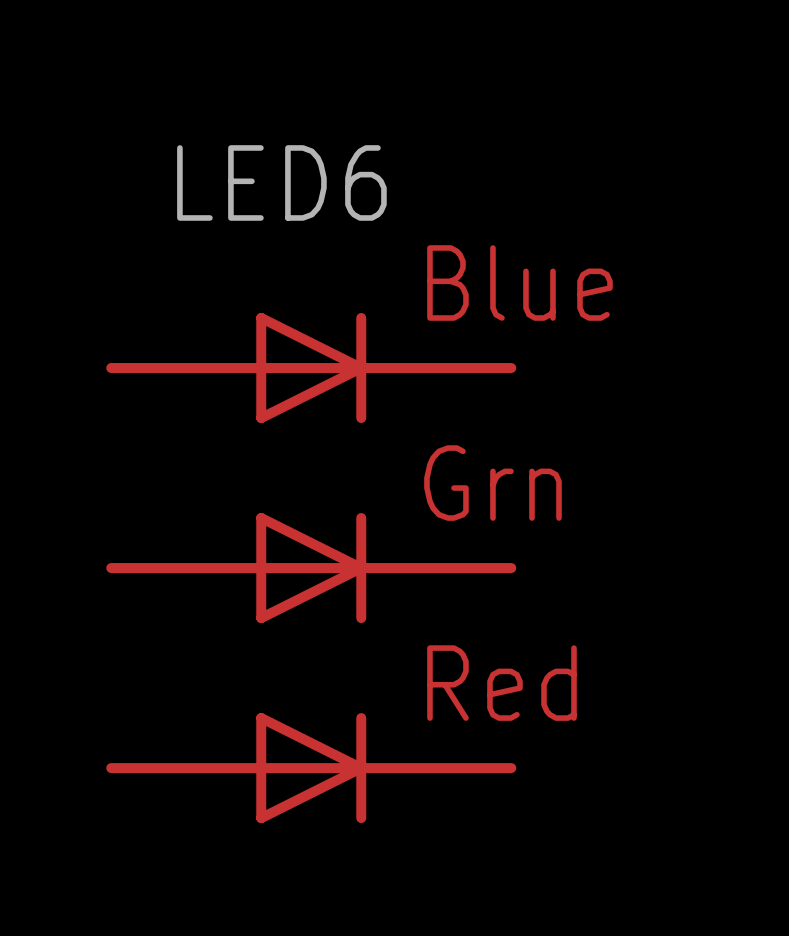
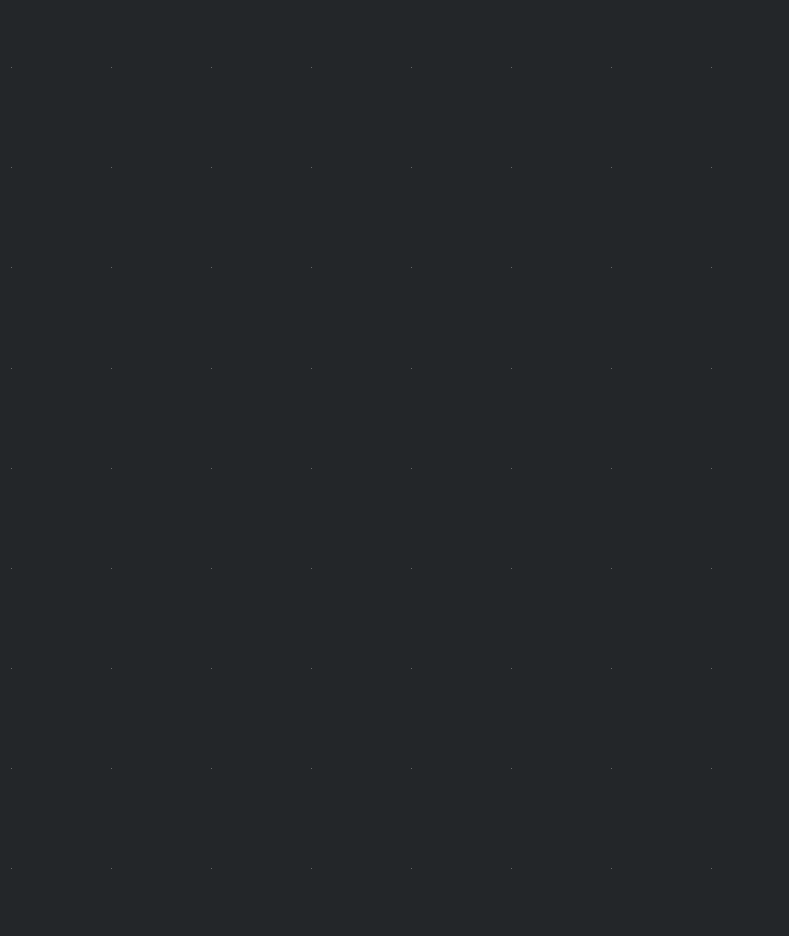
LED6: (311, 568) -> none

